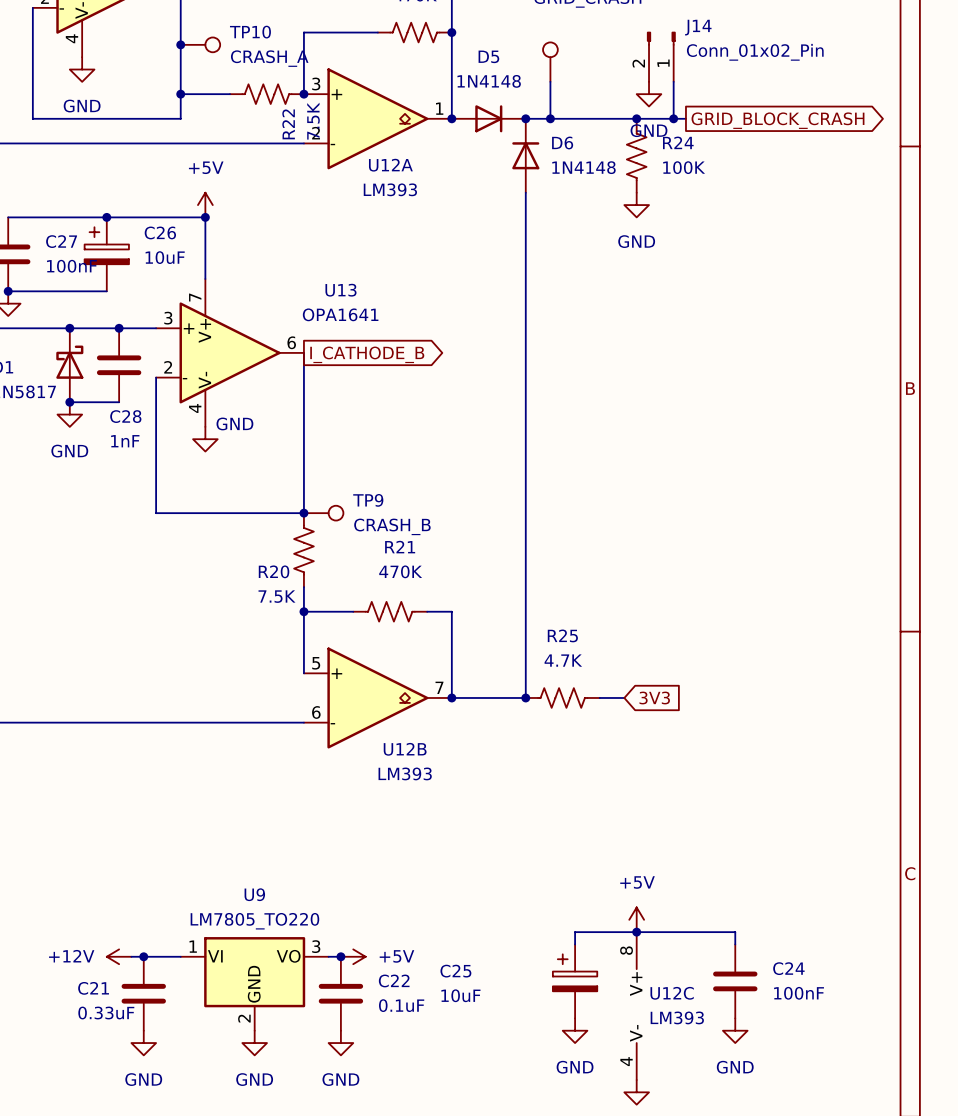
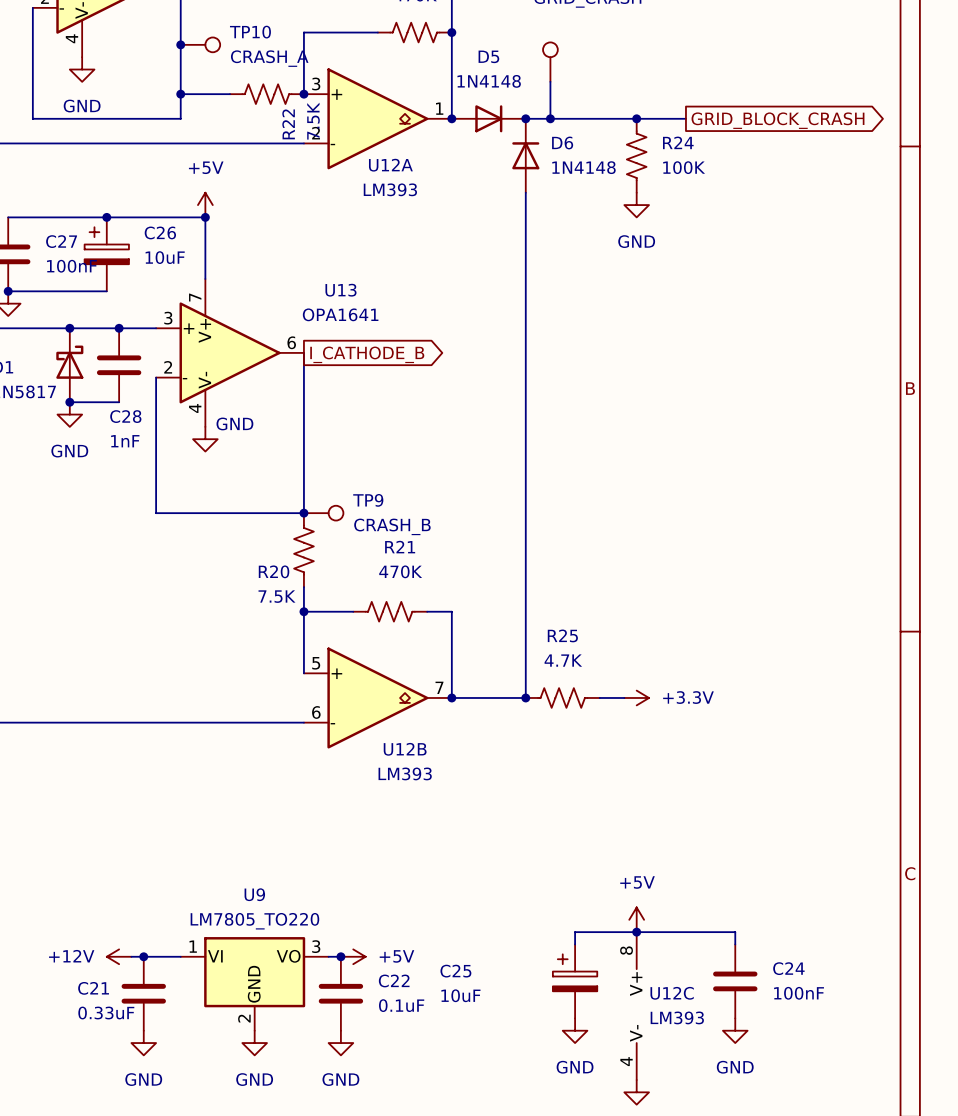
J14: Conn_01x02_Pin (661, 56) -> none
wire: (673, 81) (673, 118) -> none
power symbol: GND (649, 94) -> none
junction: (673, 118) -> none
power symbol: none -> +3.3V (636, 697)
global label: 3V3 (654, 698) -> none

